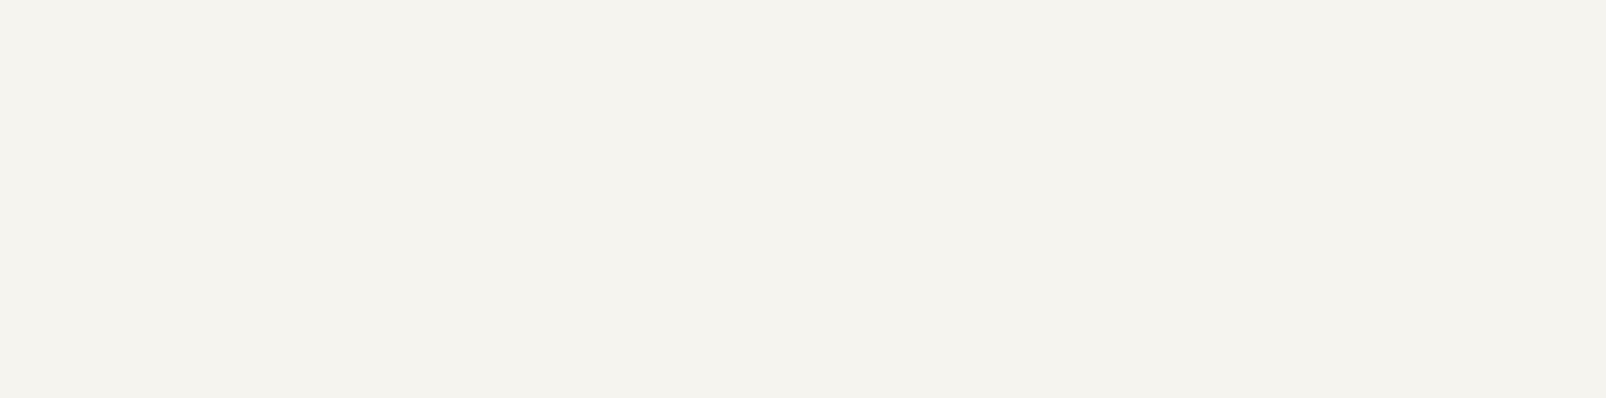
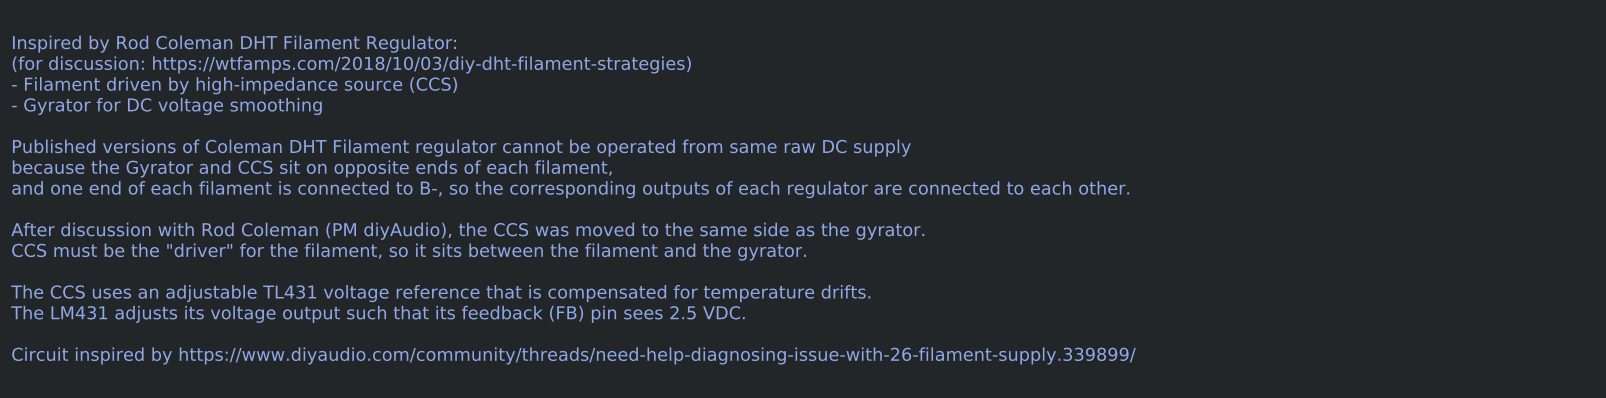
text: none -> Inspired by Rod Coleman DHT Filament Regulator: (234, 44)
text: none -> (for discussion: https://wtfamps.com/2018/10/03/diy-dht-filament-strategies) (351, 64)
text: none -> - Filament driven by high-impedance source (CCS) (234, 85)
text: none -> - Gyrator for DC voltage smoothing (166, 106)
text: none -> Published versions of Coleman DHT Filament regulator cannot be operated from same raw DC supply (461, 148)
text: none -> because the Gyrator and CCS sit on opposite ends of each filament, (312, 168)
text: none -> and one end of each filament is connected to B-, so the corresponding outputs of each regulator are connected to each other. (570, 189)
text: none -> After discussion with Rod Coleman (PM diyAudio), the CCS was moved to the same side as the gyrator. (467, 231)
text: none -> CCS must be the "driver" for the filament, so it sits between the filament and the gyrator. (409, 252)
text: none -> The CCS uses an adjustable TL431 voltage reference that is compensated for temperature drifts. (440, 293)
text: none -> The LM431 adjusts its voltage output such that its feedback (FB) pin sees 2.5 VDC. (377, 314)
text: none -> Circuit inspired by https://www.diyaudio.com/community/threads/need-help-diagnosing-issue-with-26-filament-supply.339899/ (573, 355)

